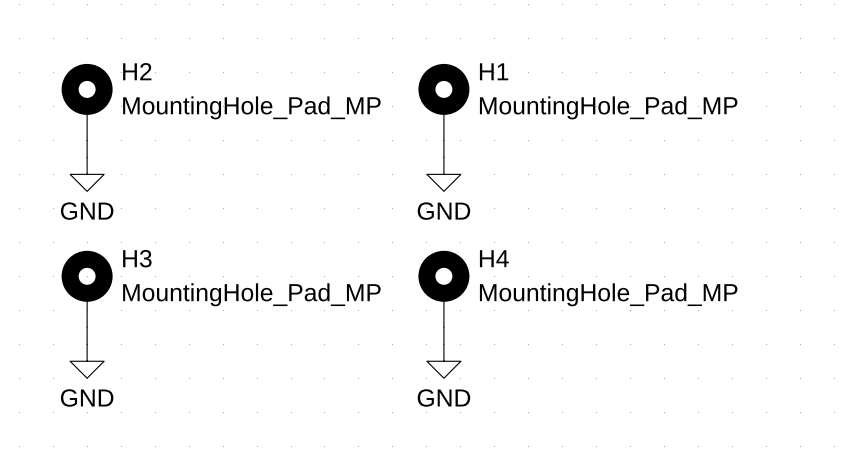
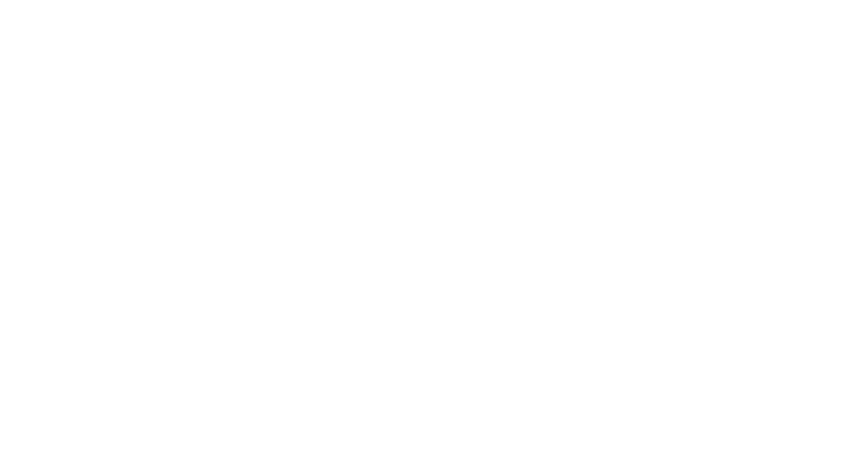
H2: MountingHole_Pad_MP (87, 102) -> none
H1: MountingHole_Pad_MP (443, 102) -> none
wire: (87, 140) (87, 157) -> none
wire: (443, 140) (443, 157) -> none
power symbol: GND (87, 174) -> none
power symbol: GND (443, 174) -> none
H3: MountingHole_Pad_MP (87, 289) -> none
H4: MountingHole_Pad_MP (443, 289) -> none
wire: (87, 327) (87, 344) -> none
wire: (443, 327) (443, 344) -> none
power symbol: GND (87, 361) -> none
power symbol: GND (443, 361) -> none

